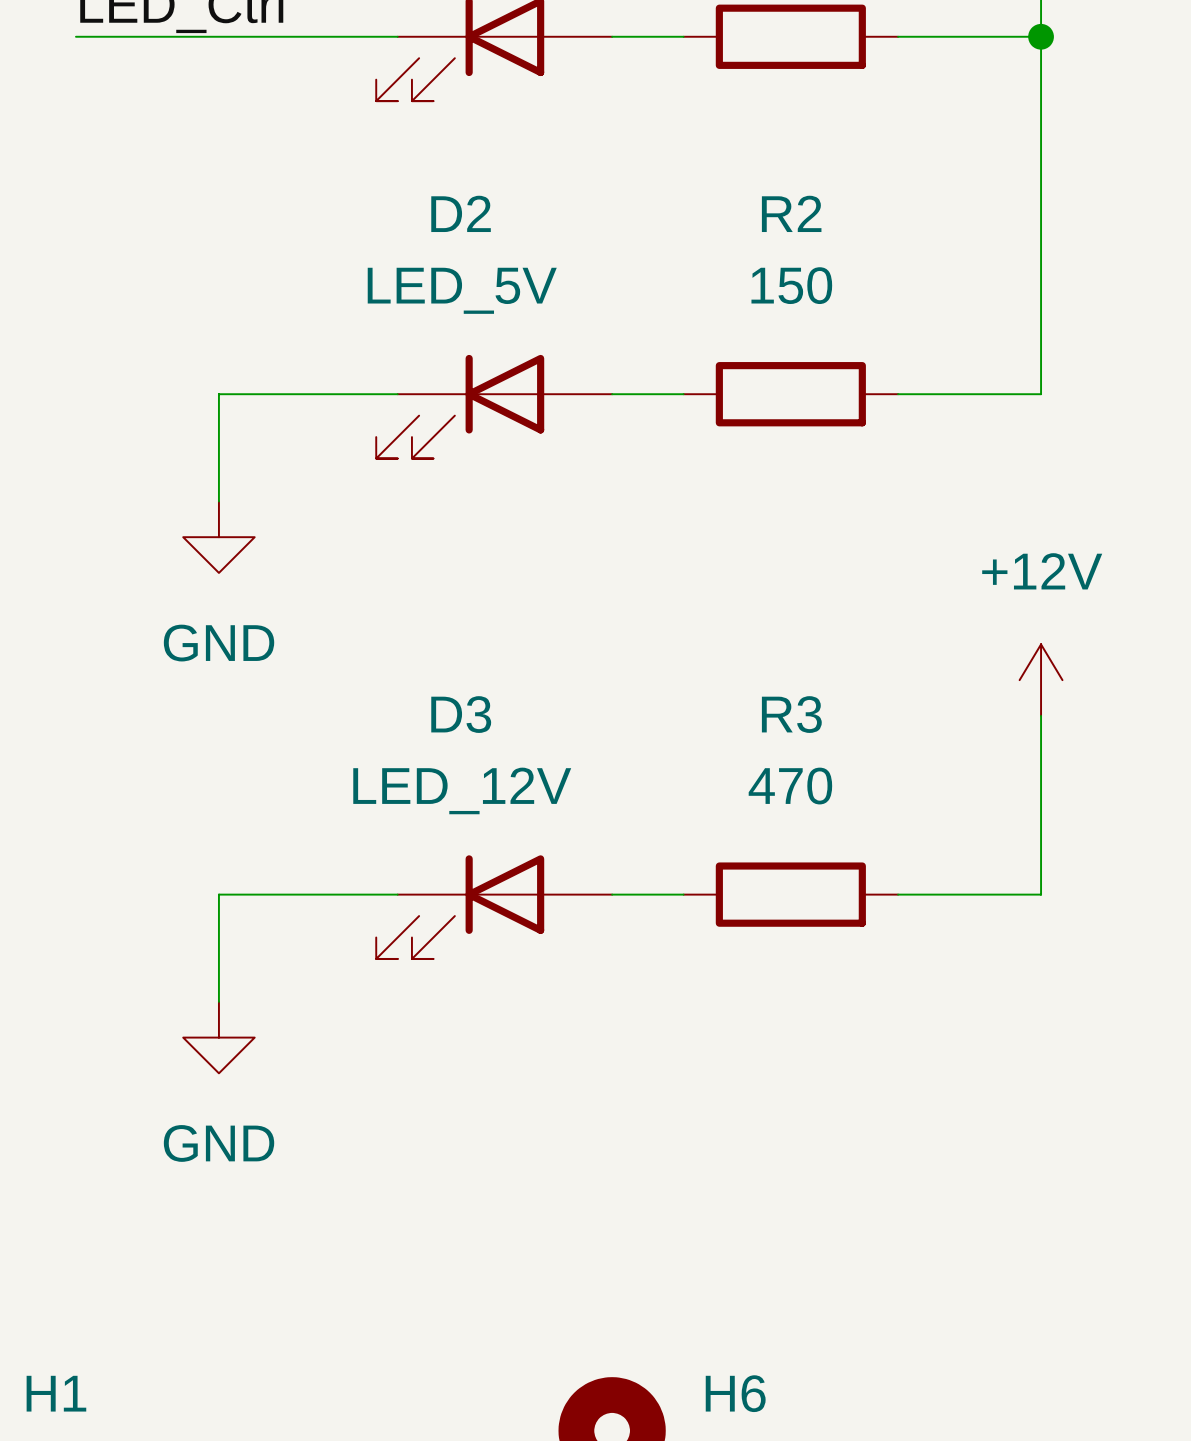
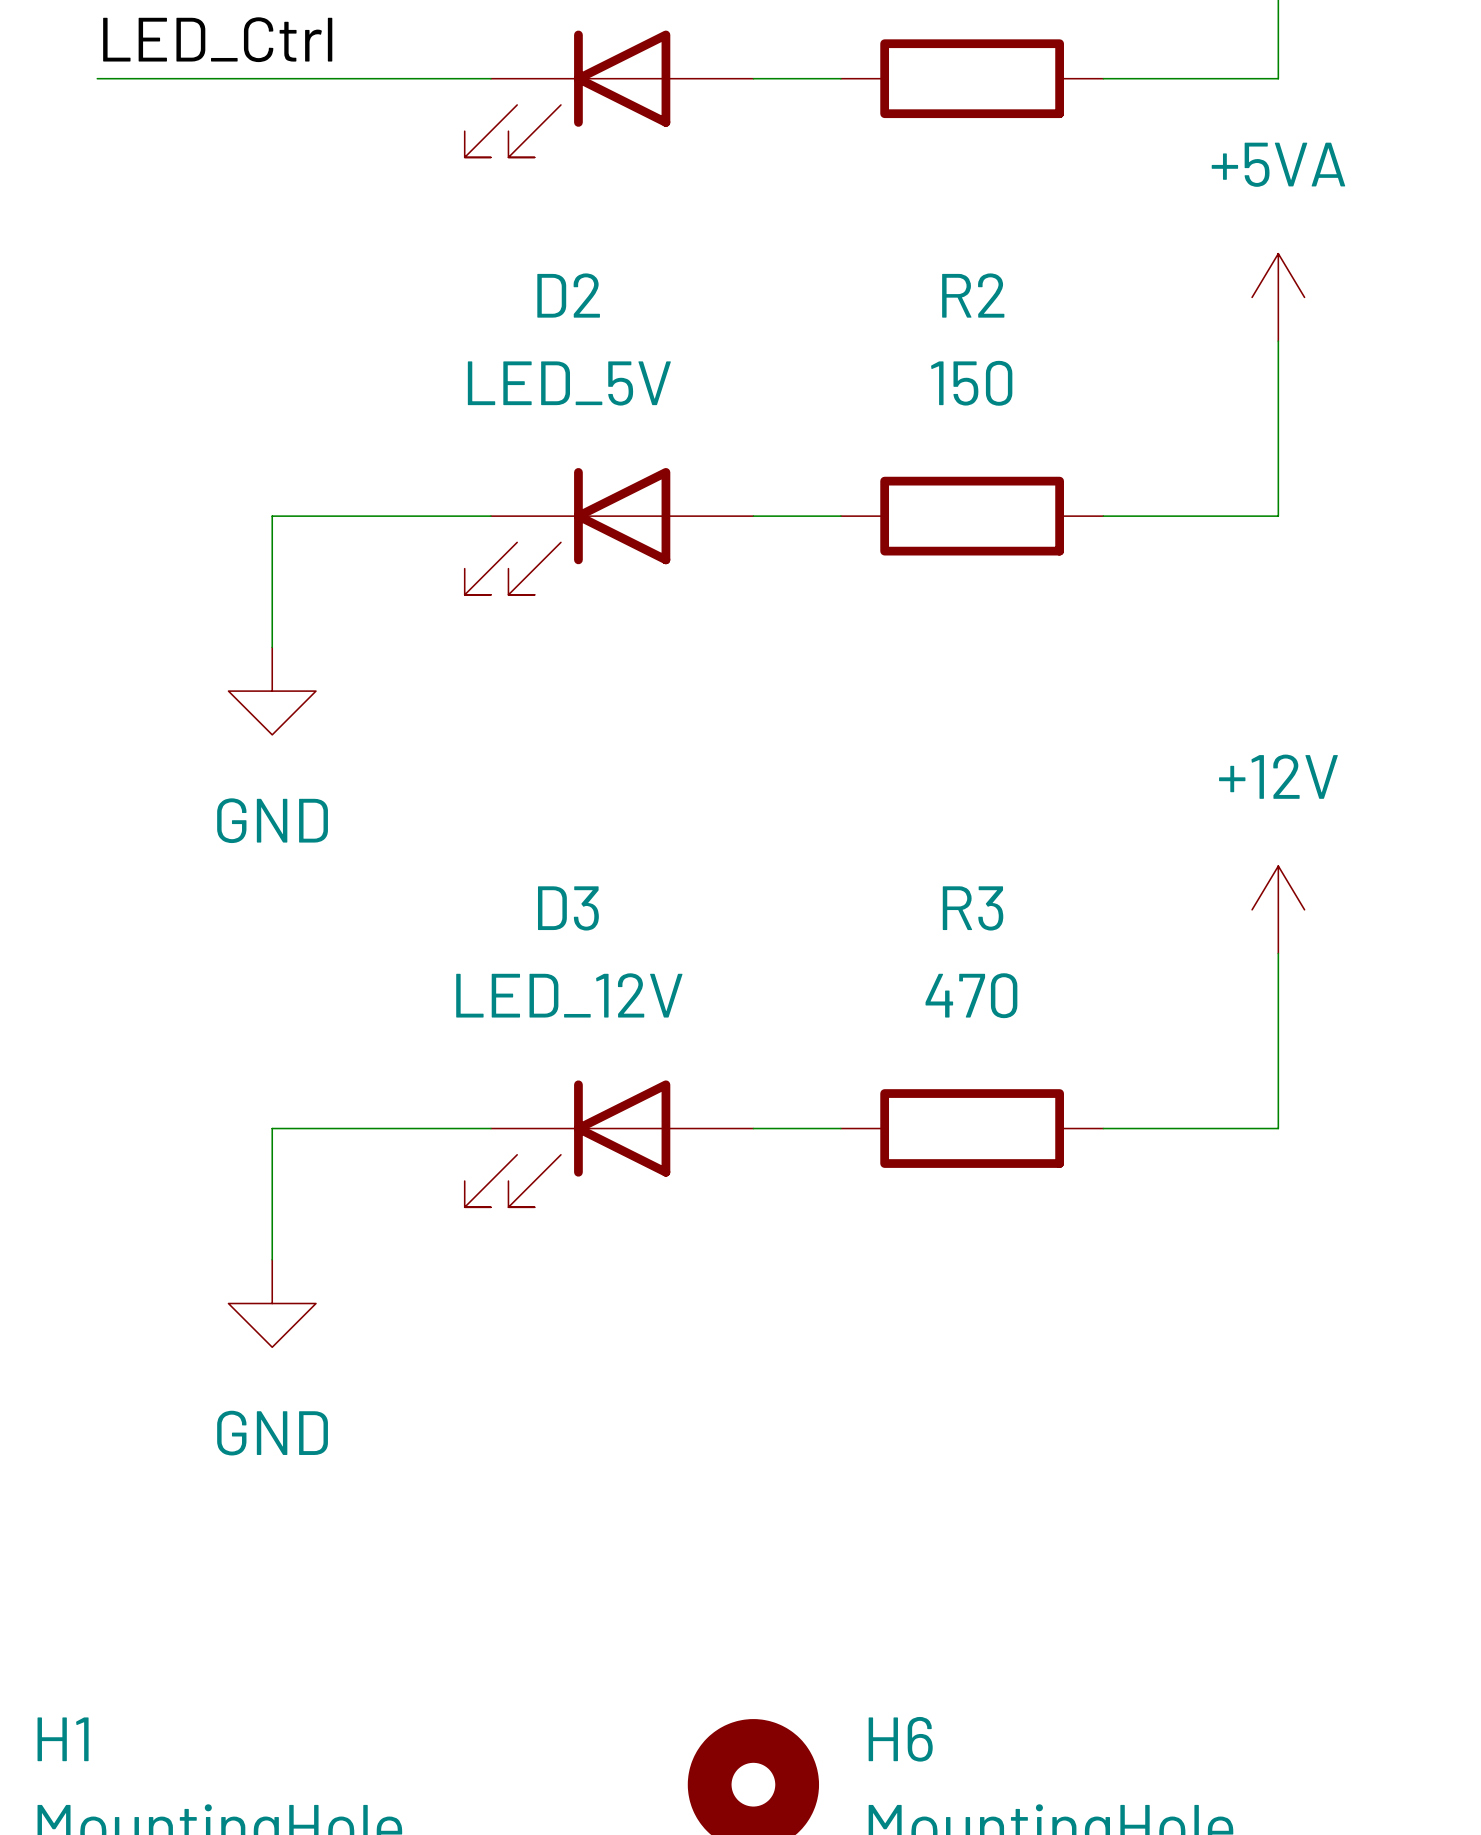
wire: (1041, 36) (1041, 251) -> none
junction: (1041, 36) -> none
power symbol: none -> +5VA (1278, 297)
power symbol position: +12V (1041, 680) -> +12V (1278, 909)

